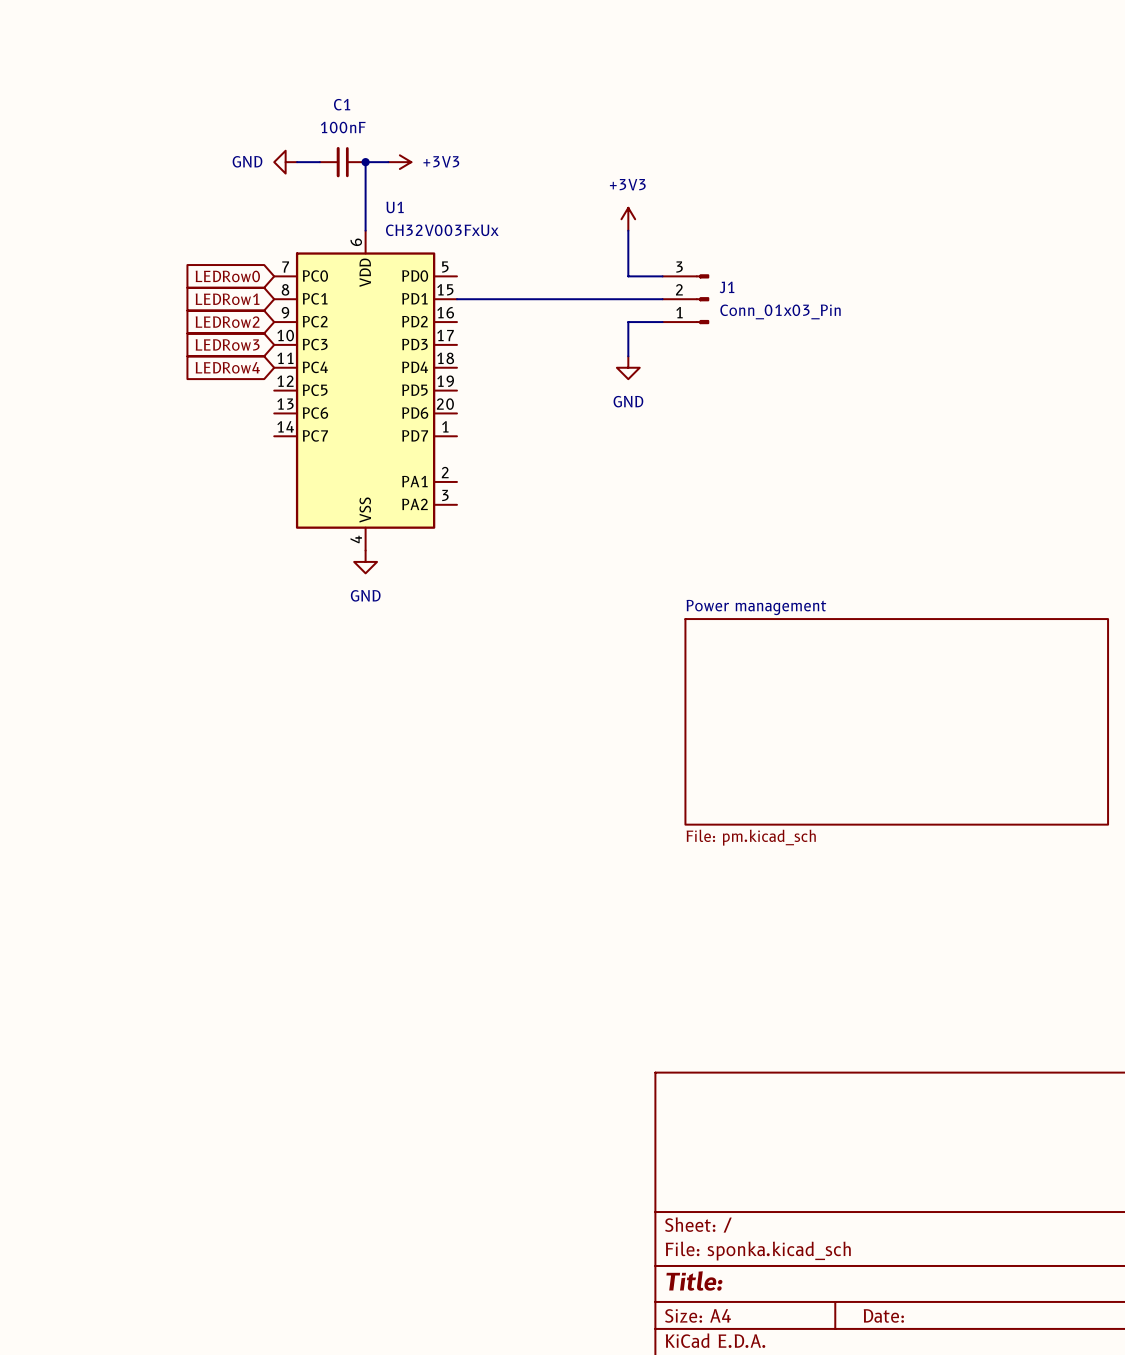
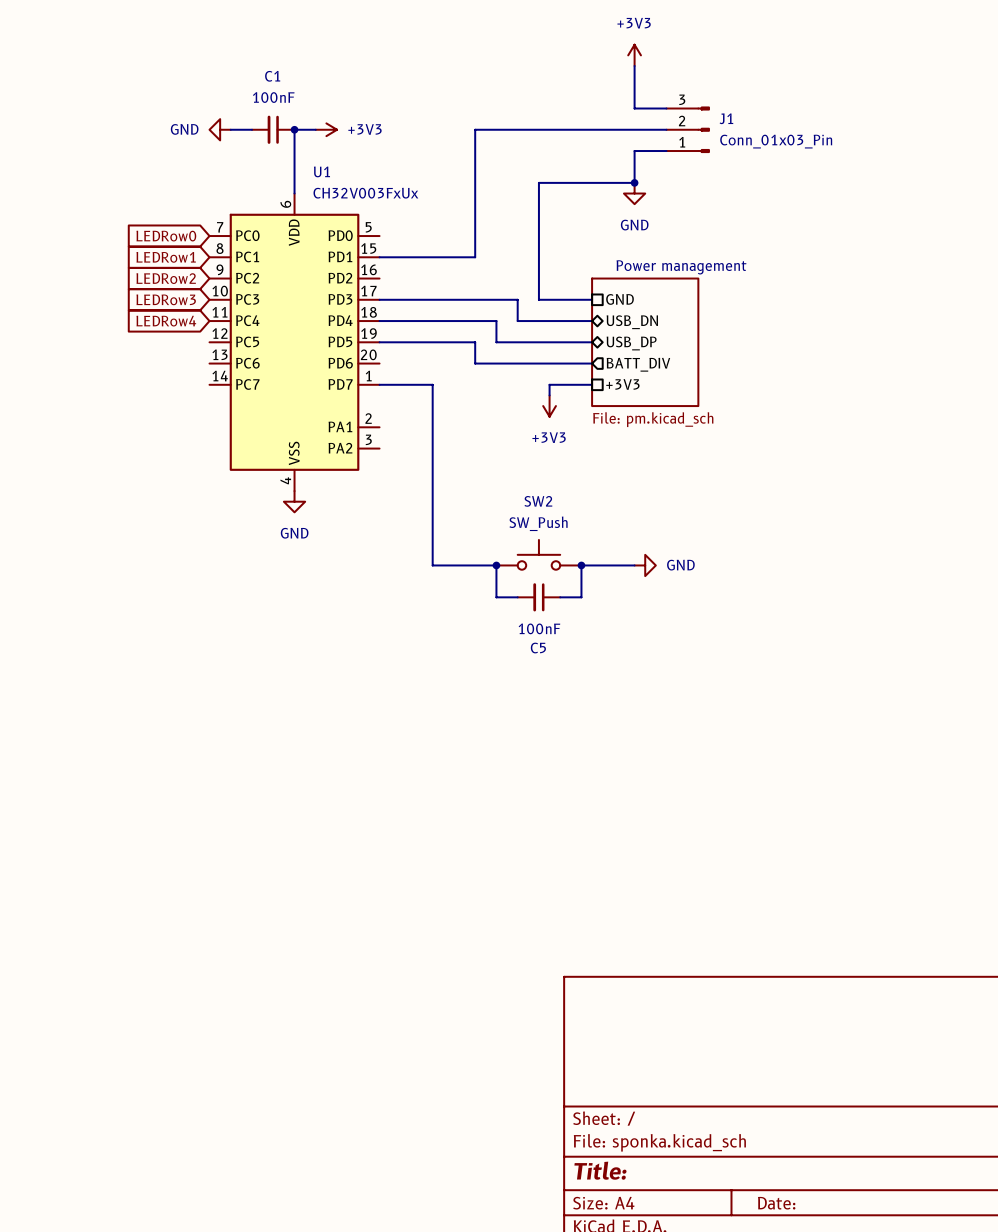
power symbol: none -> +3V3 (634, 55)
wire: none -> (634, 66) (634, 108) (666, 108)
wire: none -> (666, 151) (634, 151) (634, 182) (538, 182) (538, 193)
power symbol: +3V3 (628, 219) -> none
junction: none -> (634, 182)
power symbol: none -> GND (634, 193)
wire: (628, 276) (662, 276) -> (538, 236) (538, 278)
wire: (559, 299) (662, 299) -> (475, 257) (475, 129) (666, 129)
J1 position: (685, 299) -> (688, 129)
wire: (628, 322) (662, 322) -> none
wire: none -> (379, 299) (517, 299) (517, 321) (592, 321)
wire: (628, 344) (628, 356) -> (538, 299) (592, 299)
sheet pin: none -> GND (620, 299)
wire: none -> (379, 321) (496, 321) (496, 342) (592, 342)
power symbol: GND (628, 367) -> none
sheet pin: none -> USB_DN (632, 322)
wire: none -> (379, 342) (475, 342) (475, 363) (592, 363)
sheet Power management: none -> File: pm.kicad_sch (645, 342)
sheet pin: none -> USB_DP (631, 343)
sheet pin: none -> BATT_DIV (638, 364)
sheet pin: none -> +3V3 (622, 384)
wire: none -> (379, 384) (432, 384) (432, 565) (496, 565) (496, 597) (517, 597)
wire: none -> (592, 384) (549, 384) (549, 395)
power symbol: none -> +3V3 (549, 406)
SW2: none -> SW_Push (538, 554)
junction: none -> (496, 565)
junction: none -> (581, 565)
wire: none -> (634, 565) (581, 565) (581, 597) (560, 597)
power symbol: none -> GND (645, 565)
C5: none -> 100nF (538, 597)
sheet Power management: File: pm.kicad_sch (896, 721) -> none

